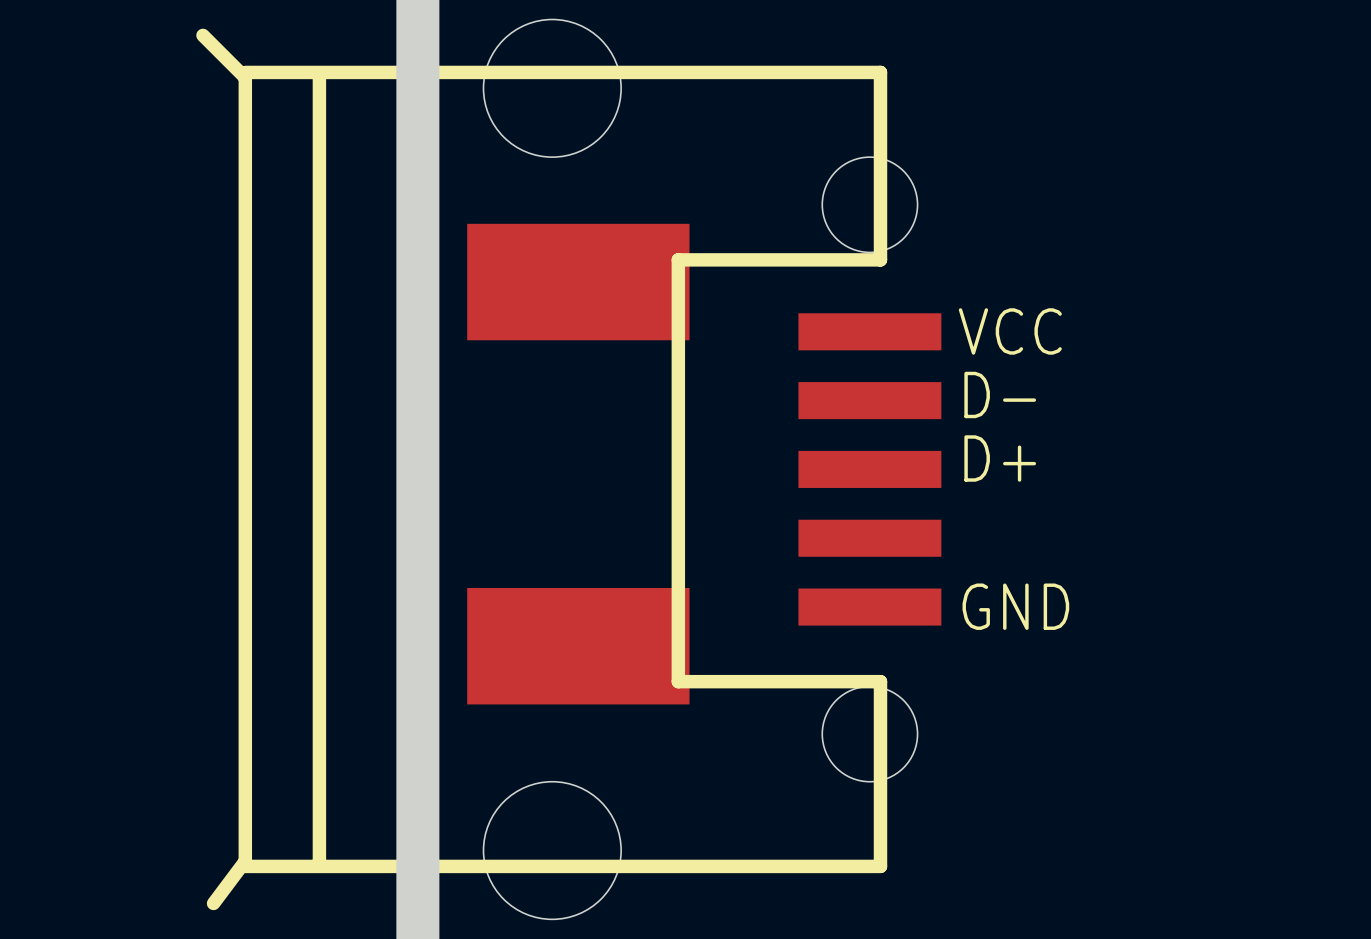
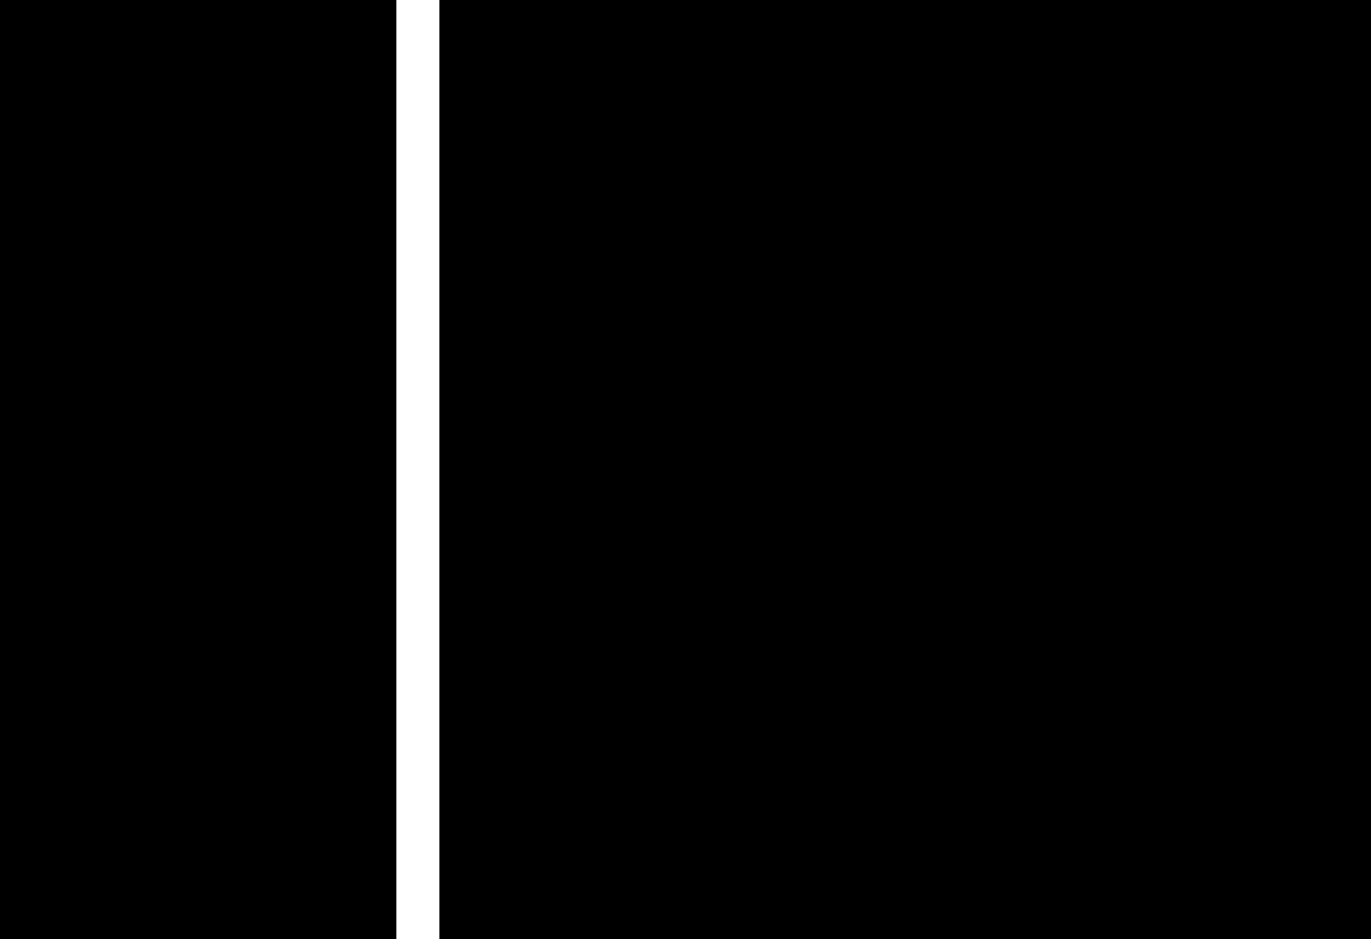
part: (568, 469) -> none

